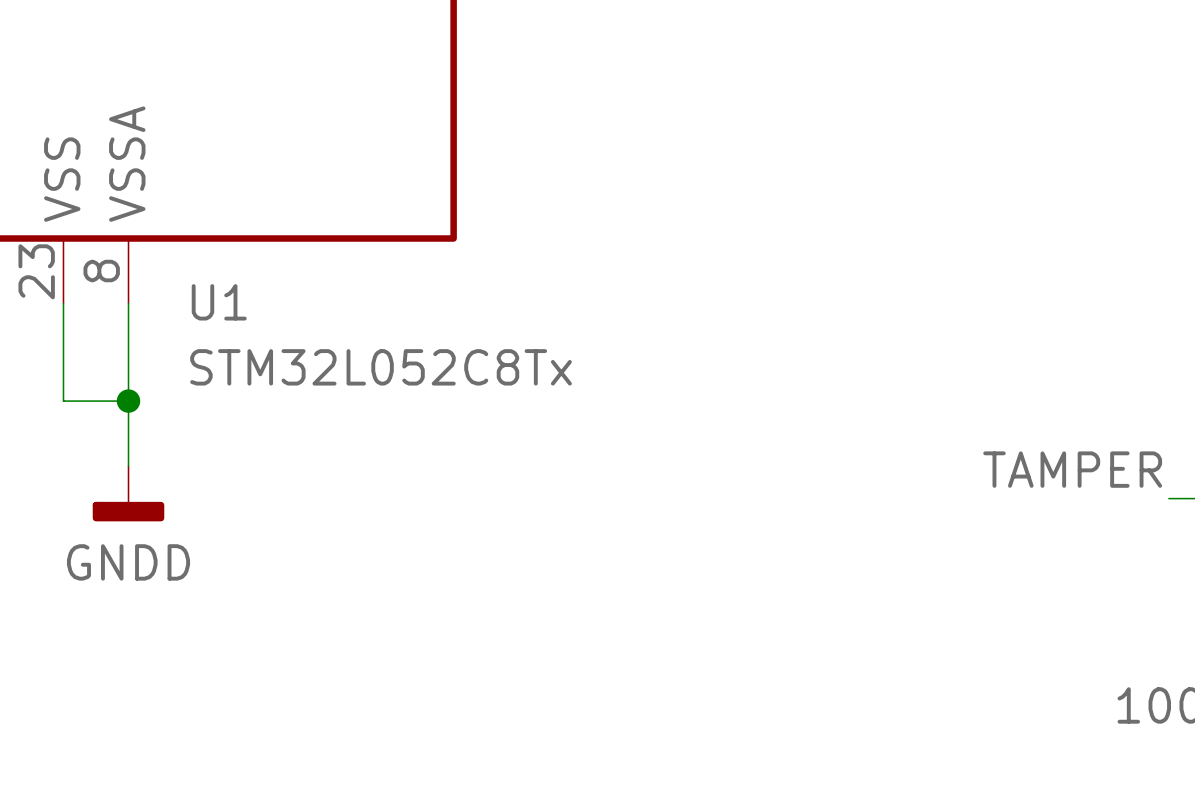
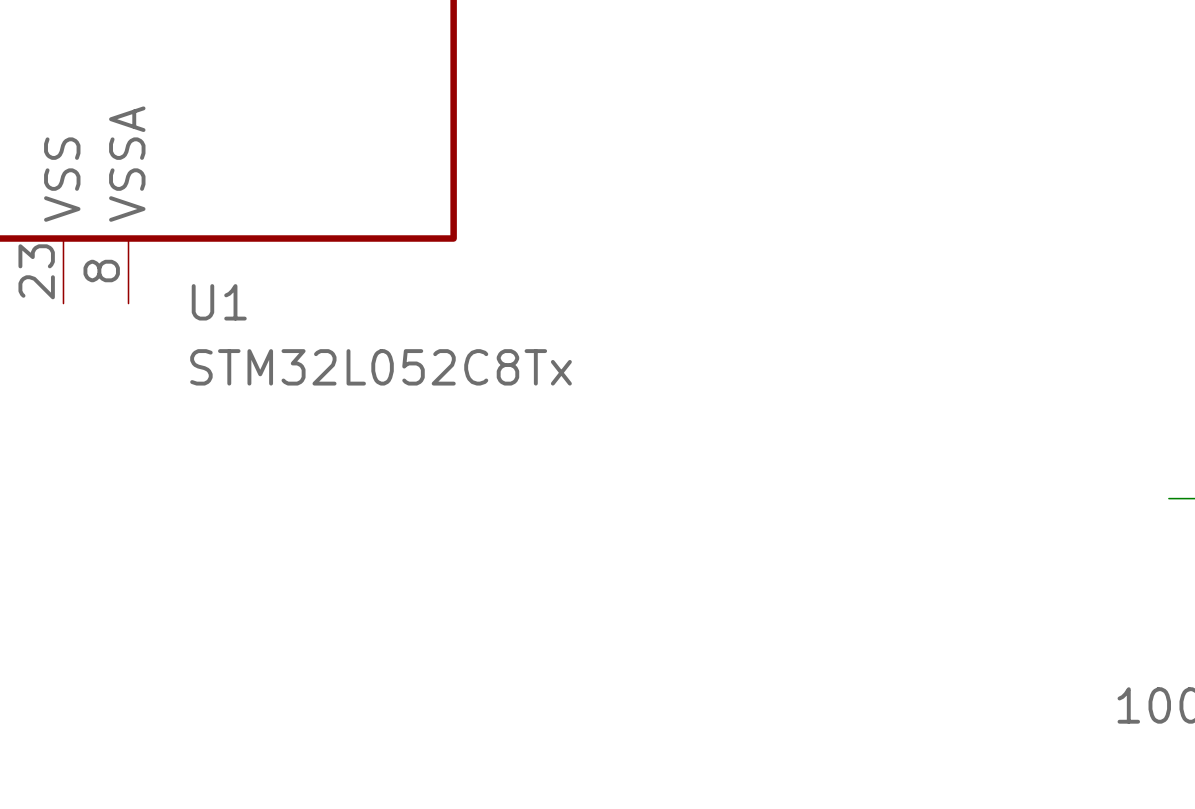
wire: (63, 303) (63, 401) (128, 401) -> none
wire: (128, 303) (128, 466) -> none
junction: (128, 401) -> none
label: TAMPER (1072, 469) -> none
power symbol: GNDD (128, 493) -> none

